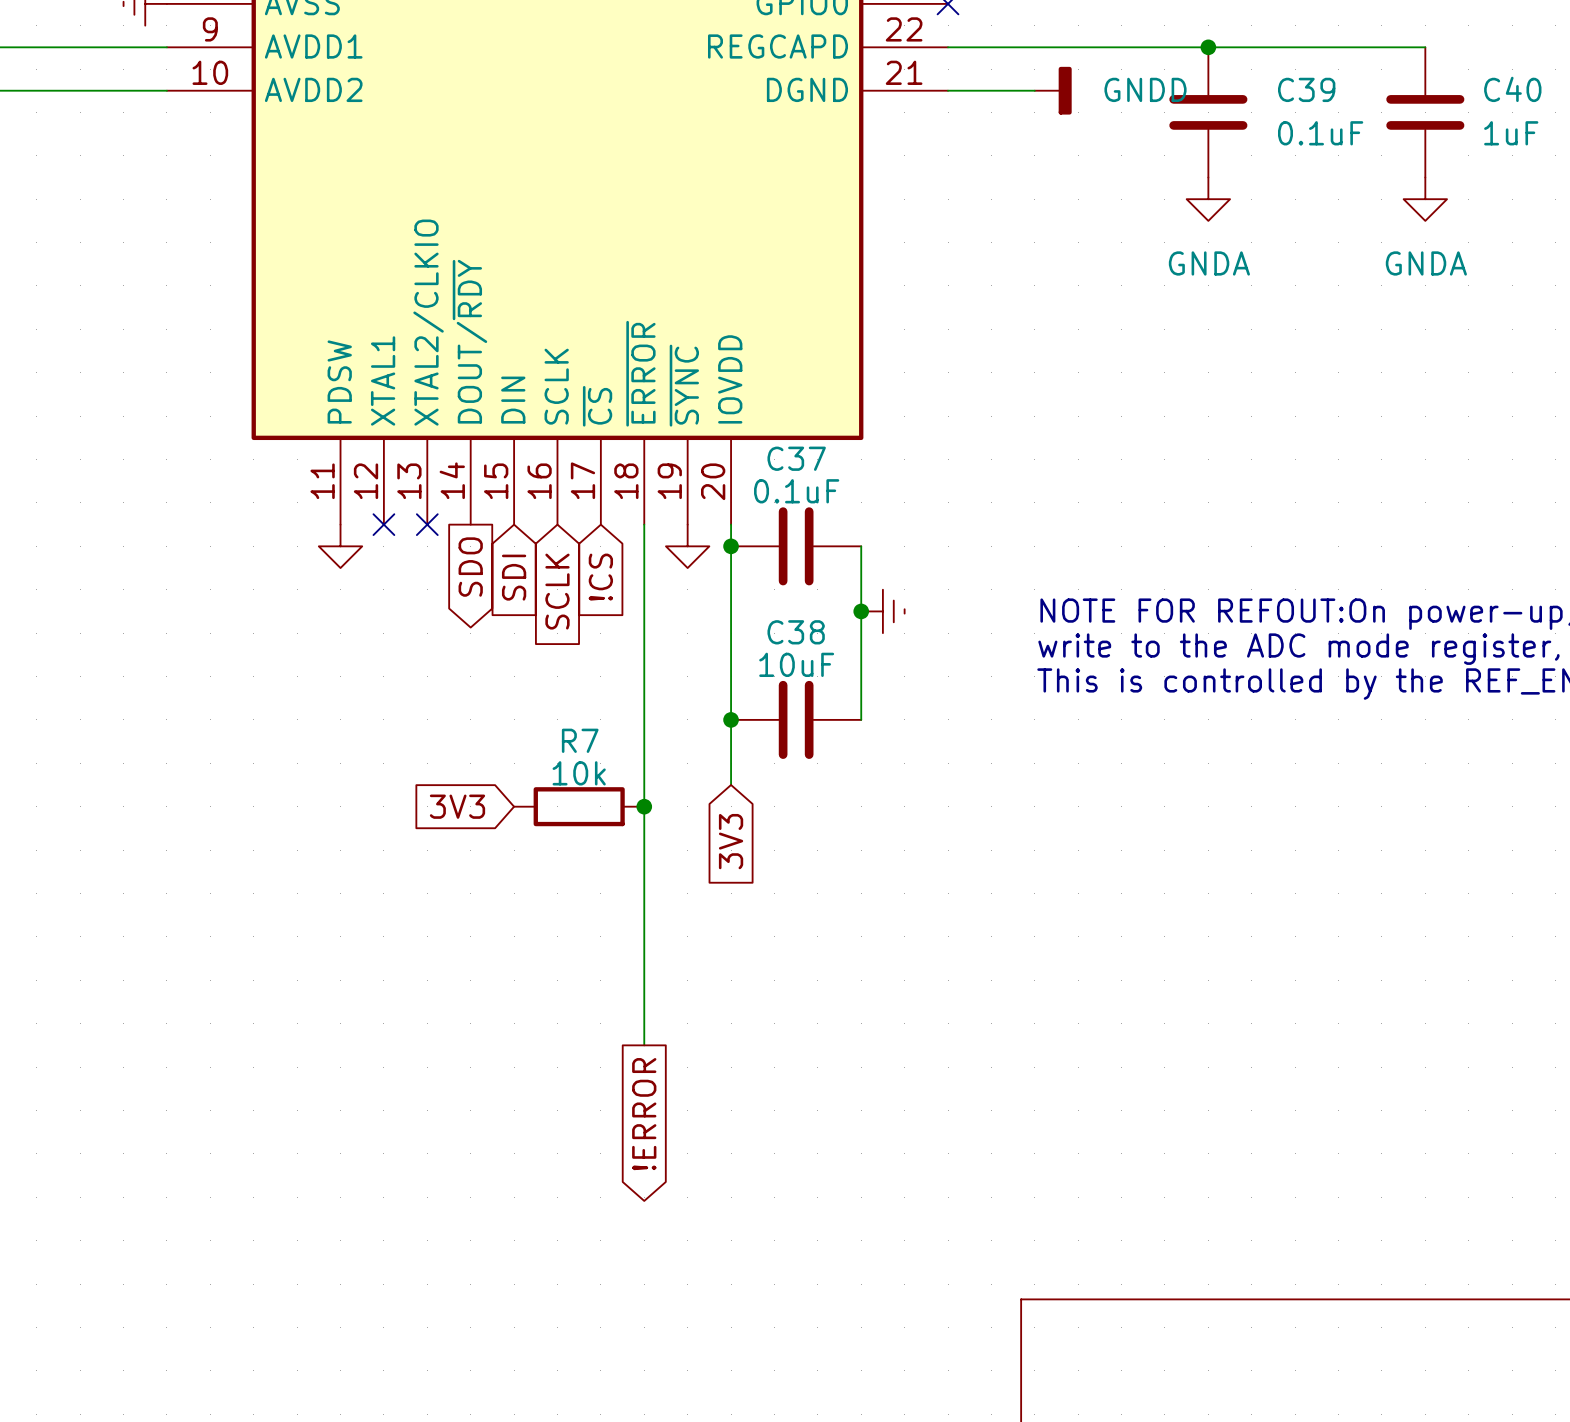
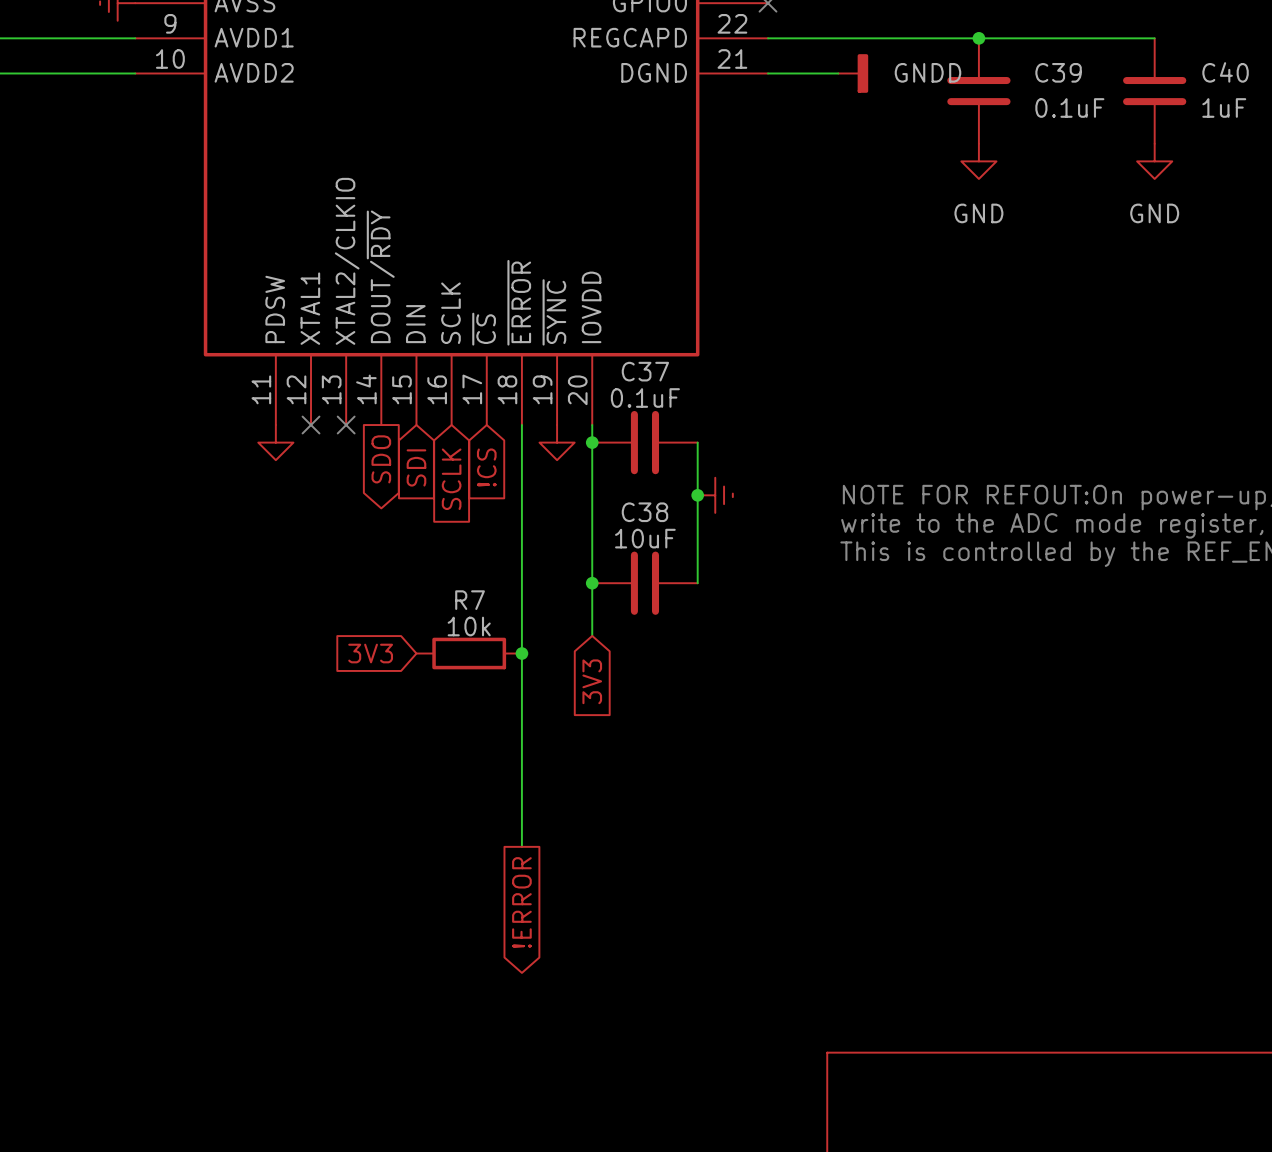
power symbol: GNDA (1208, 199) -> GND (978, 161)
power symbol: GNDA (1425, 199) -> GND (1154, 161)

